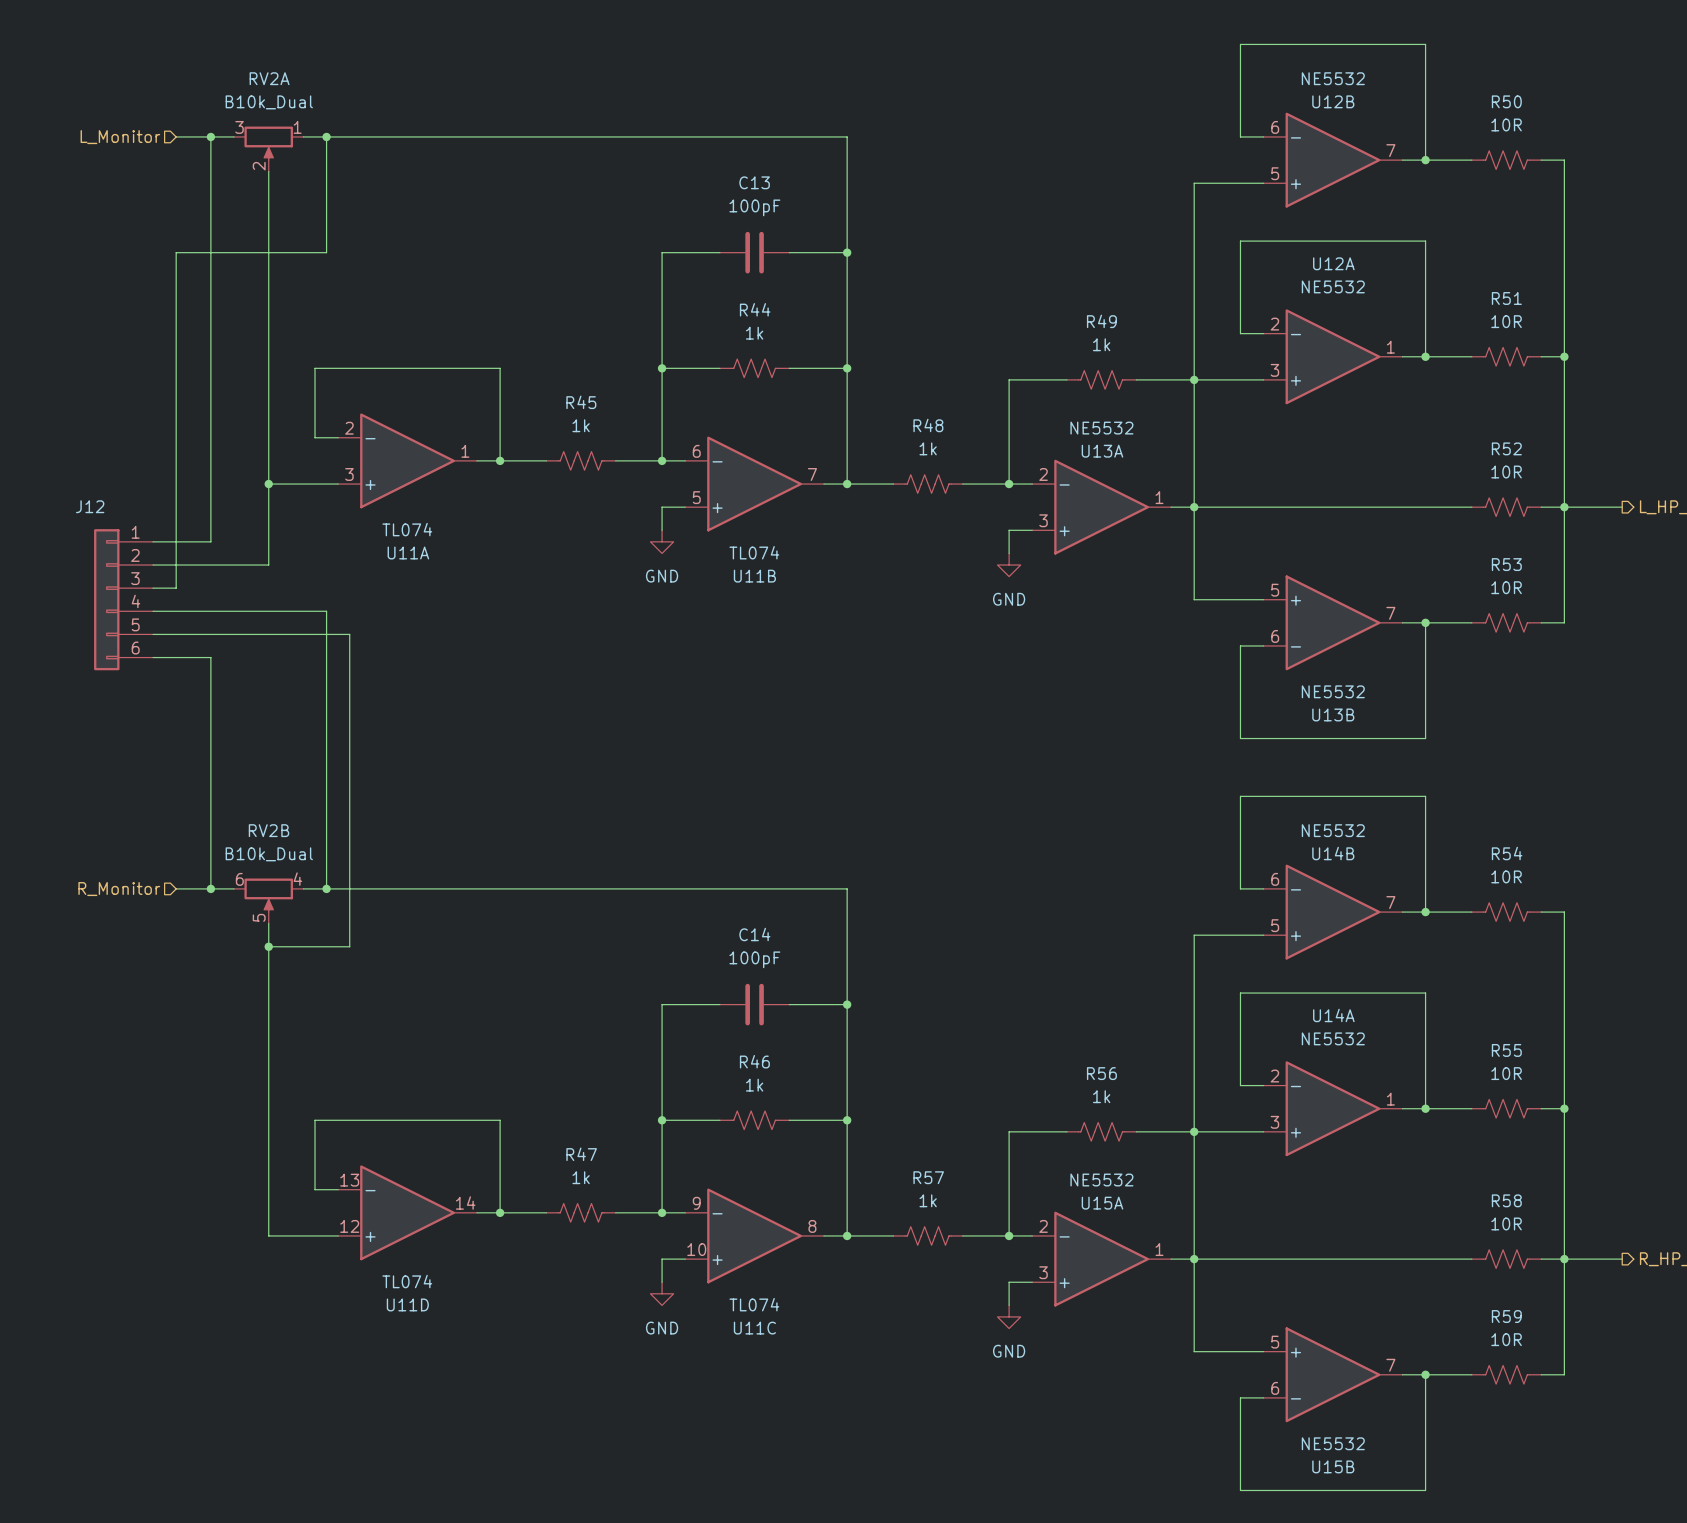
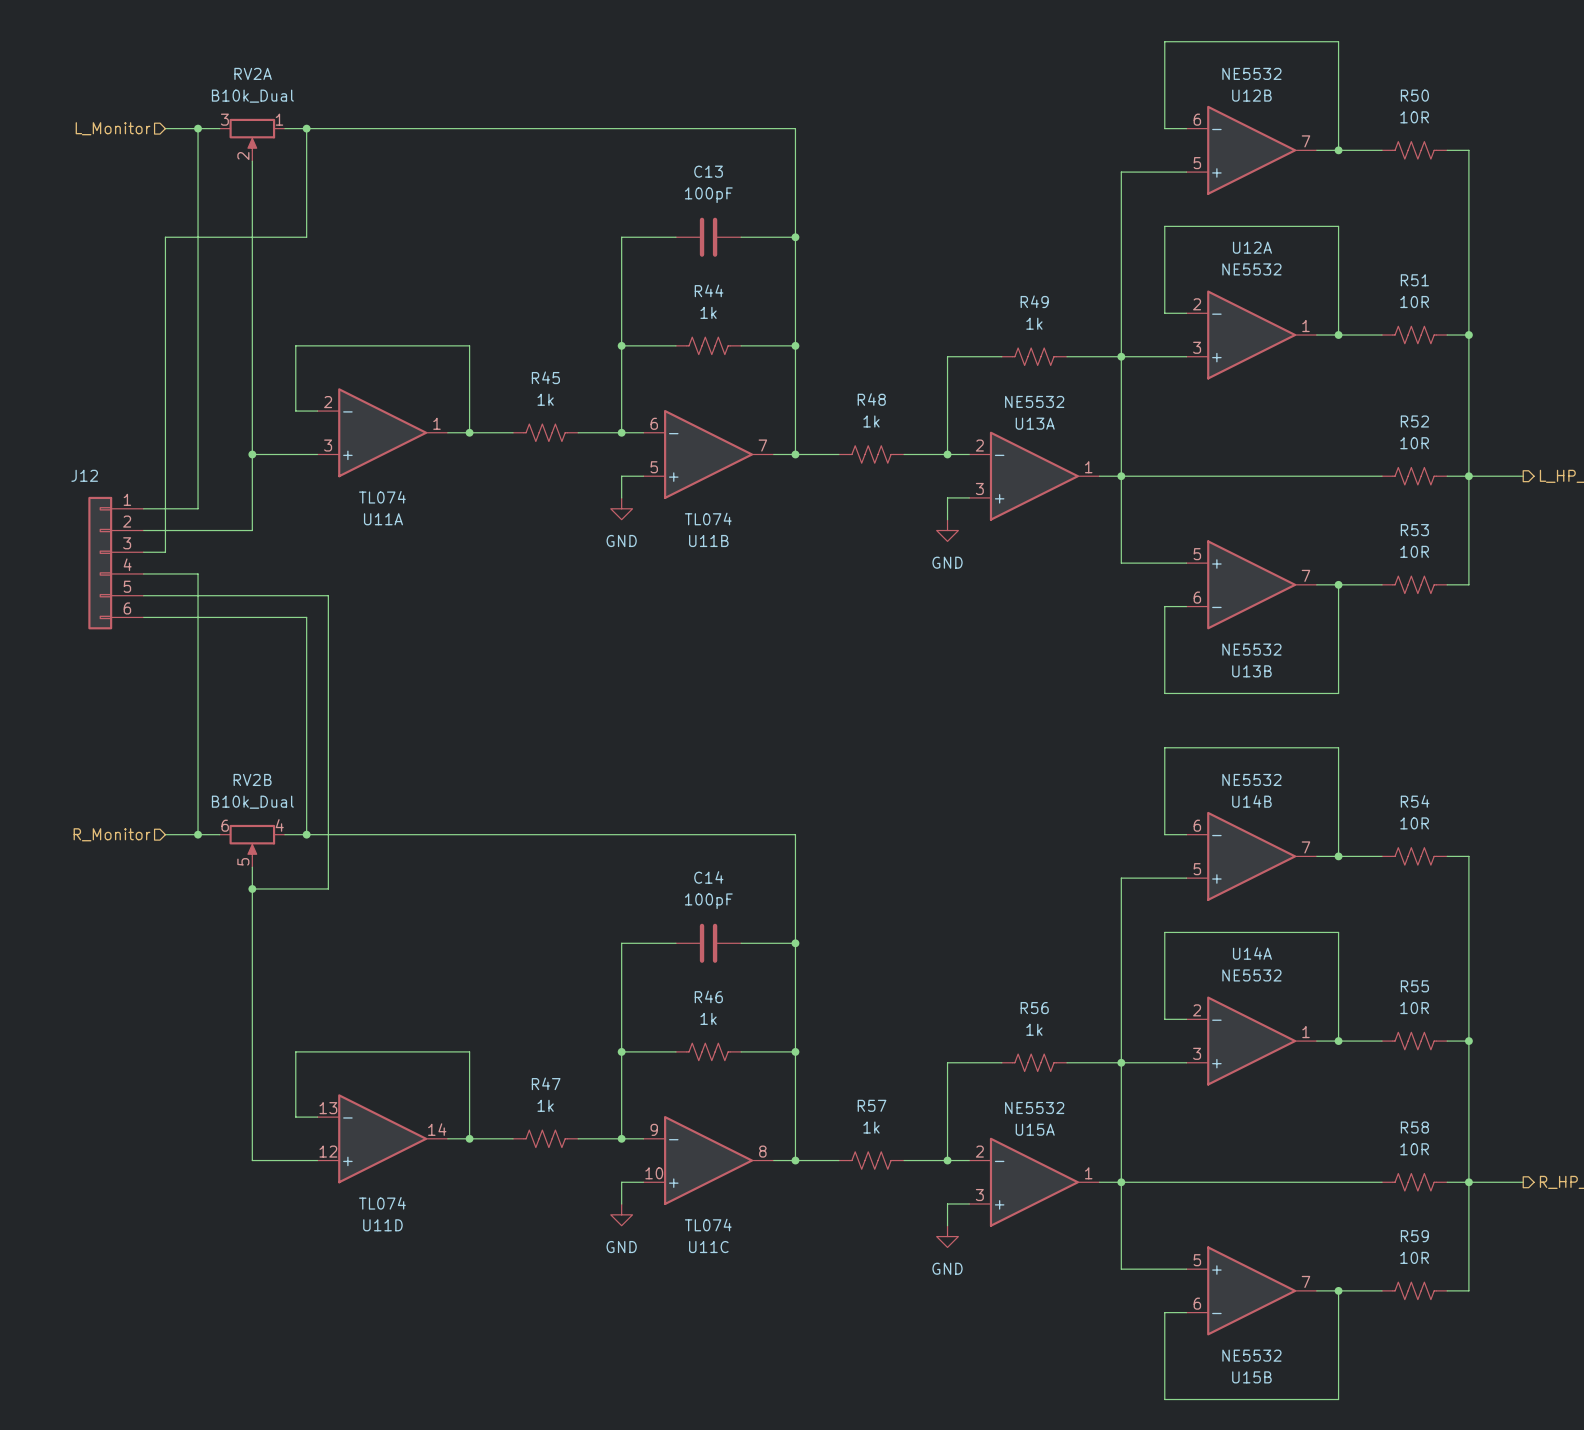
wire: (210, 611) (326, 611) (326, 657) -> (198, 573) (198, 617) (306, 617)

